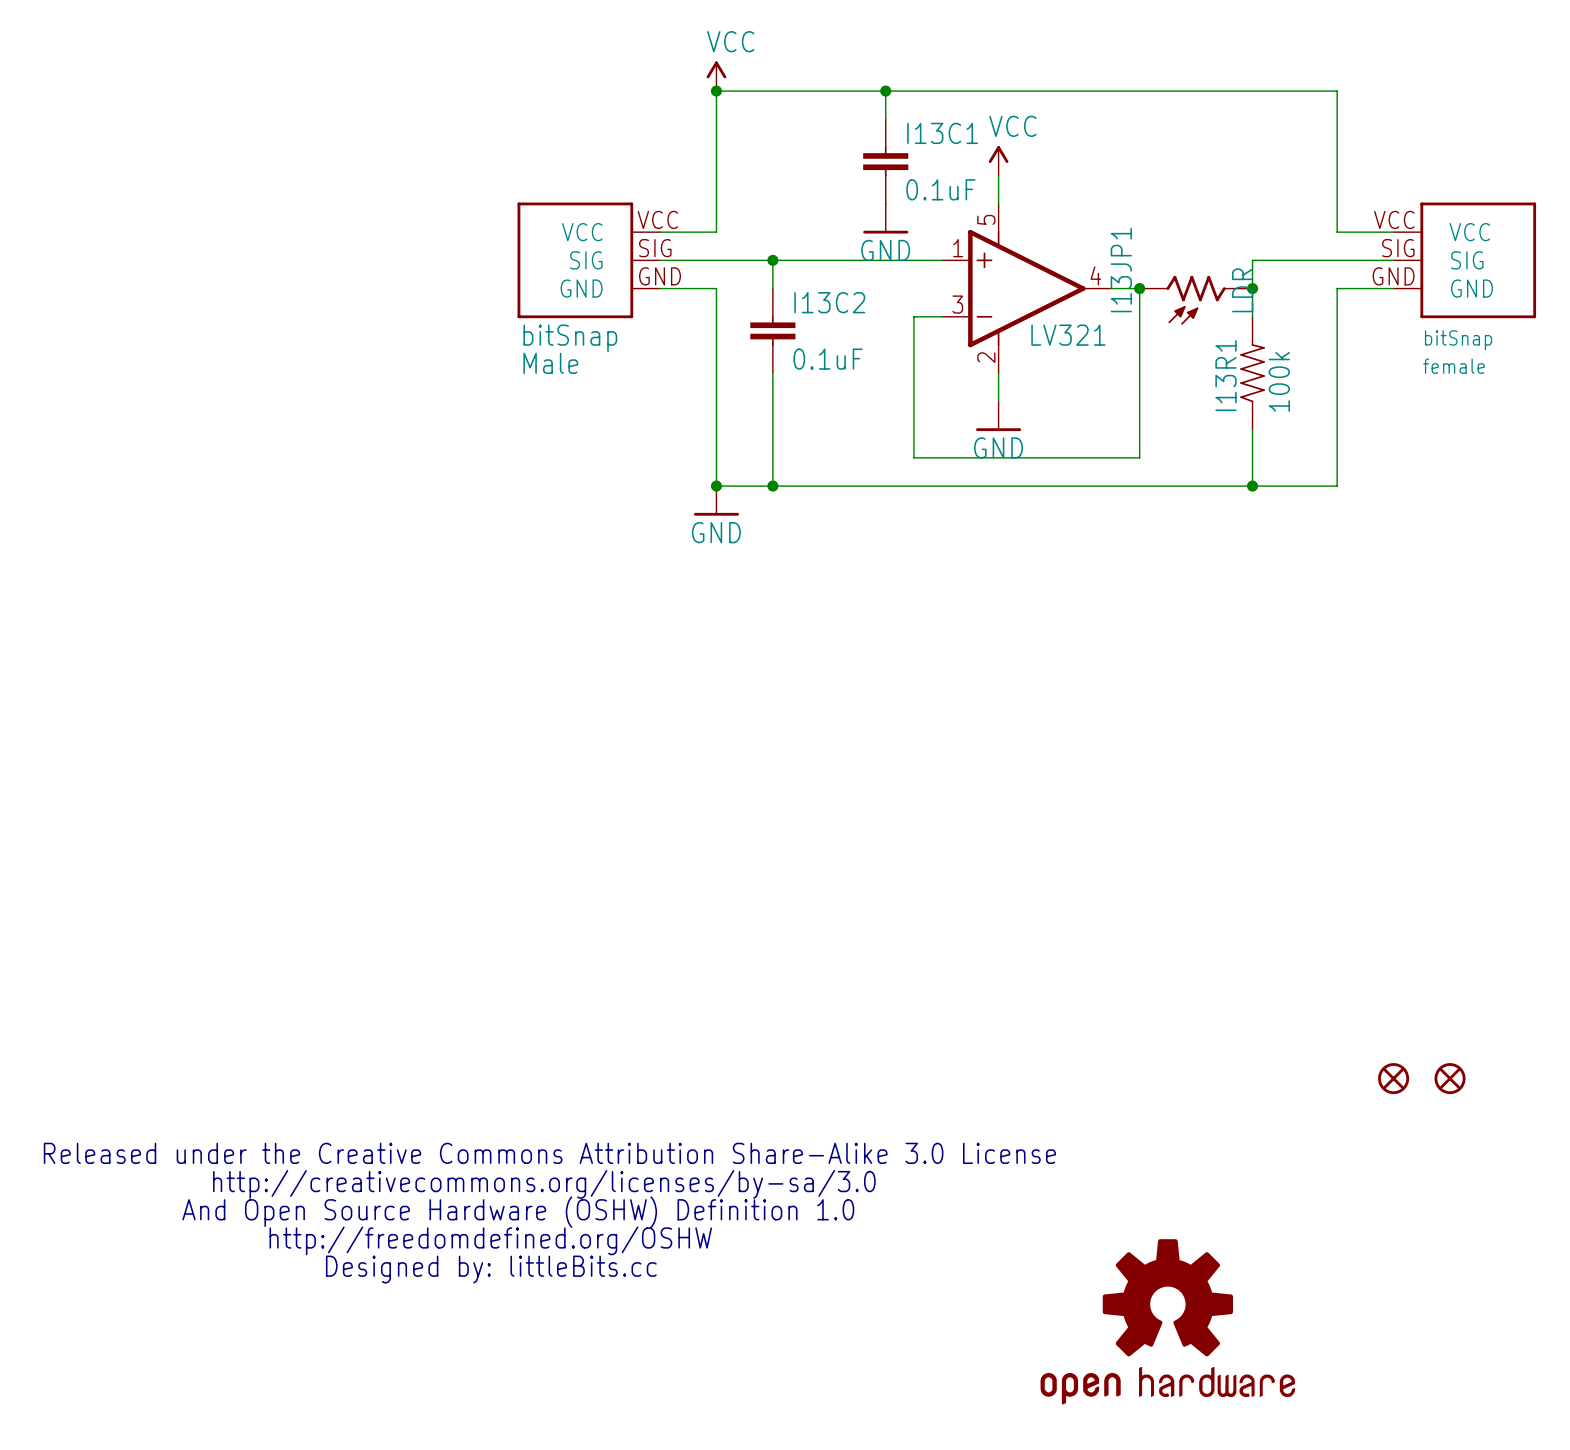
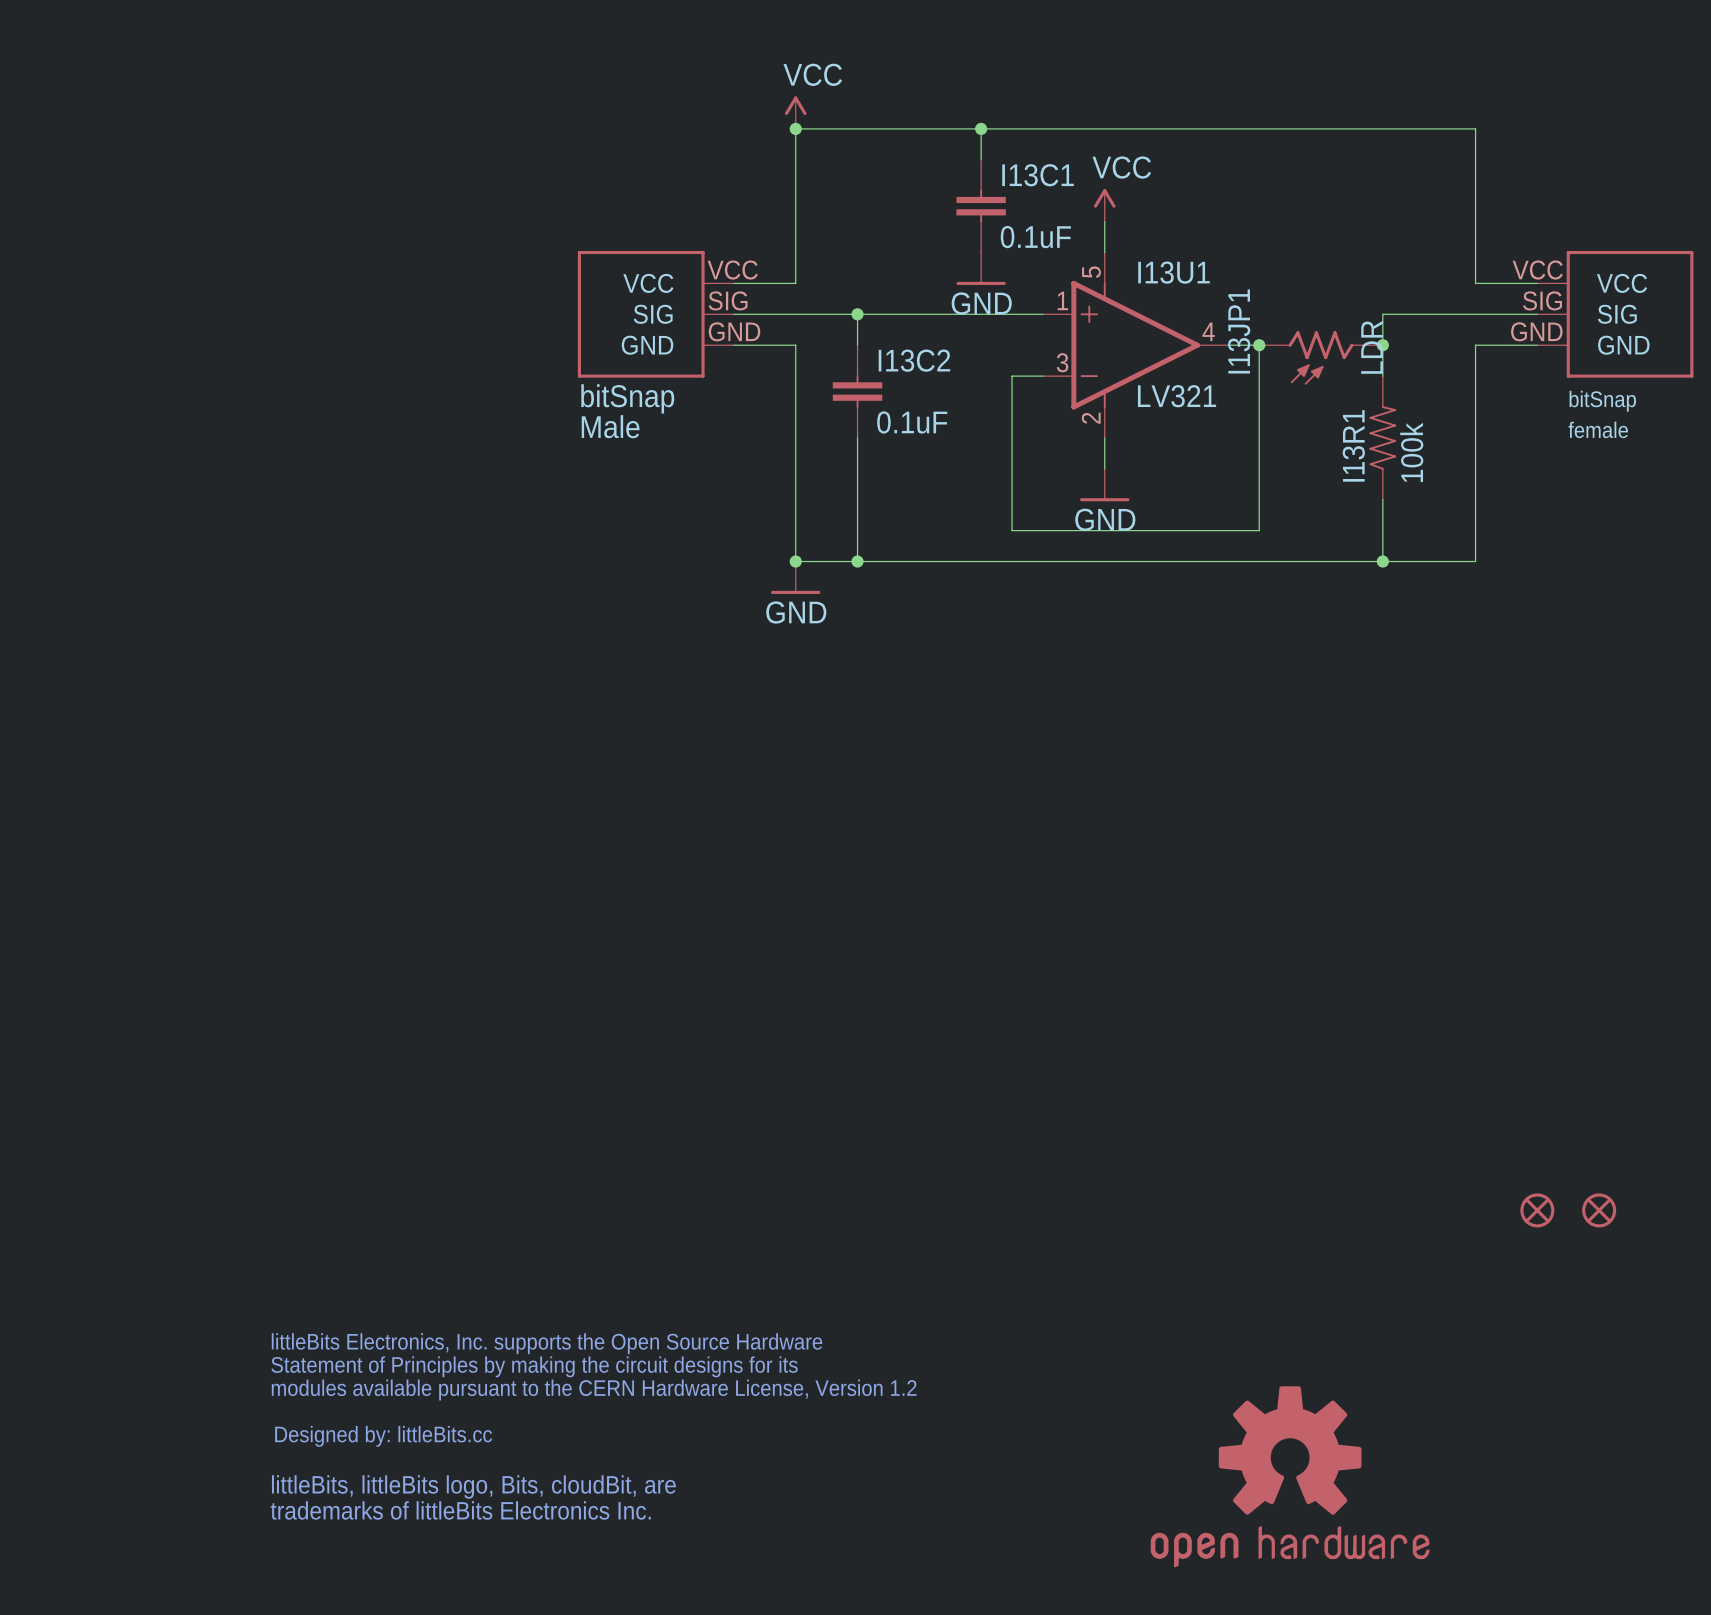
I13U1 name: none -> I13U1 (1174, 272)
part: (549, 1213) -> none
part: none -> (593, 1426)

